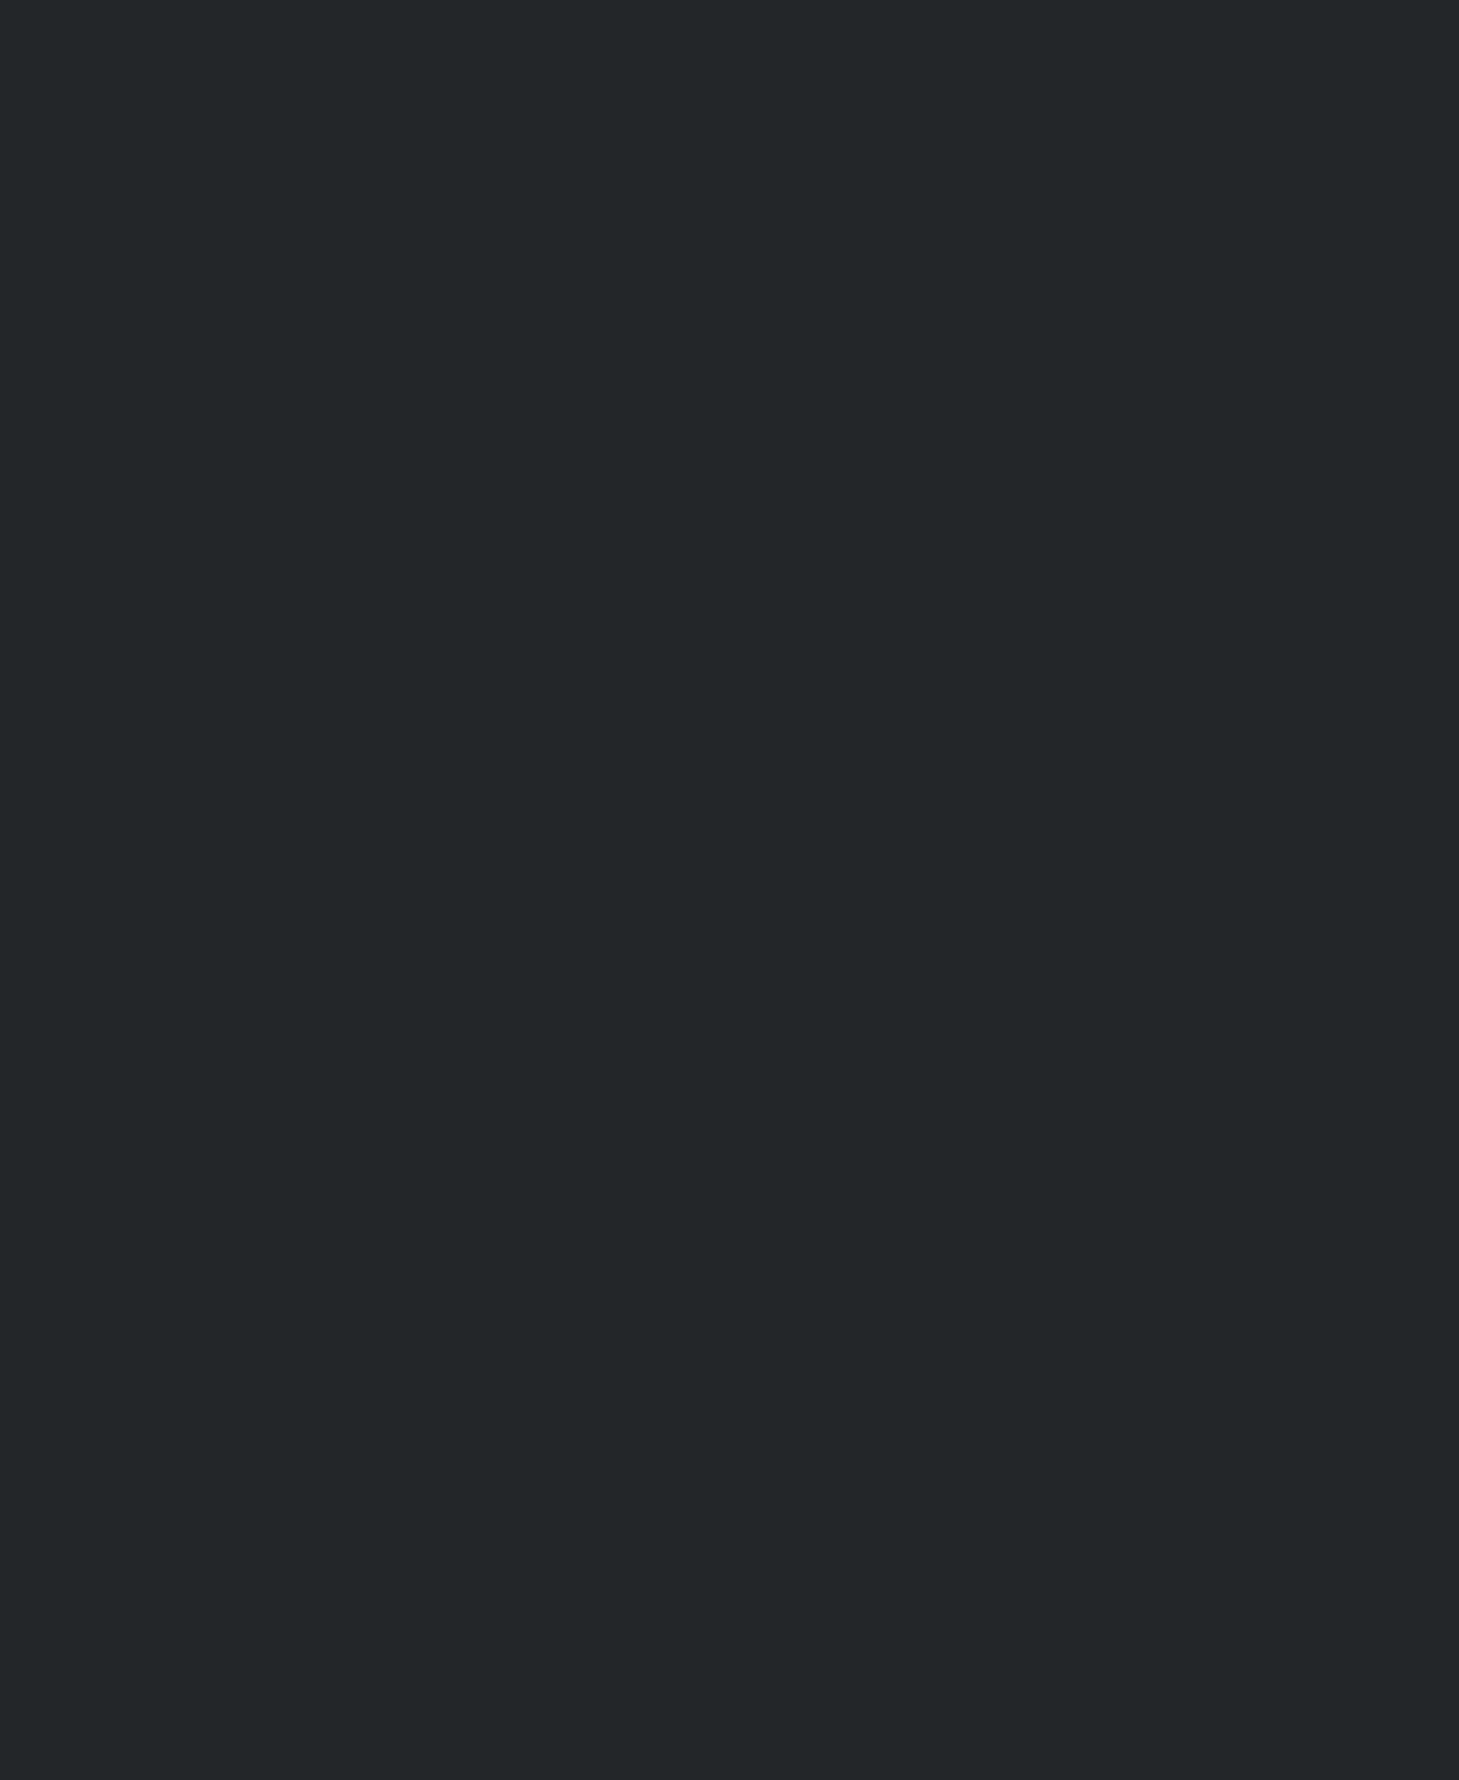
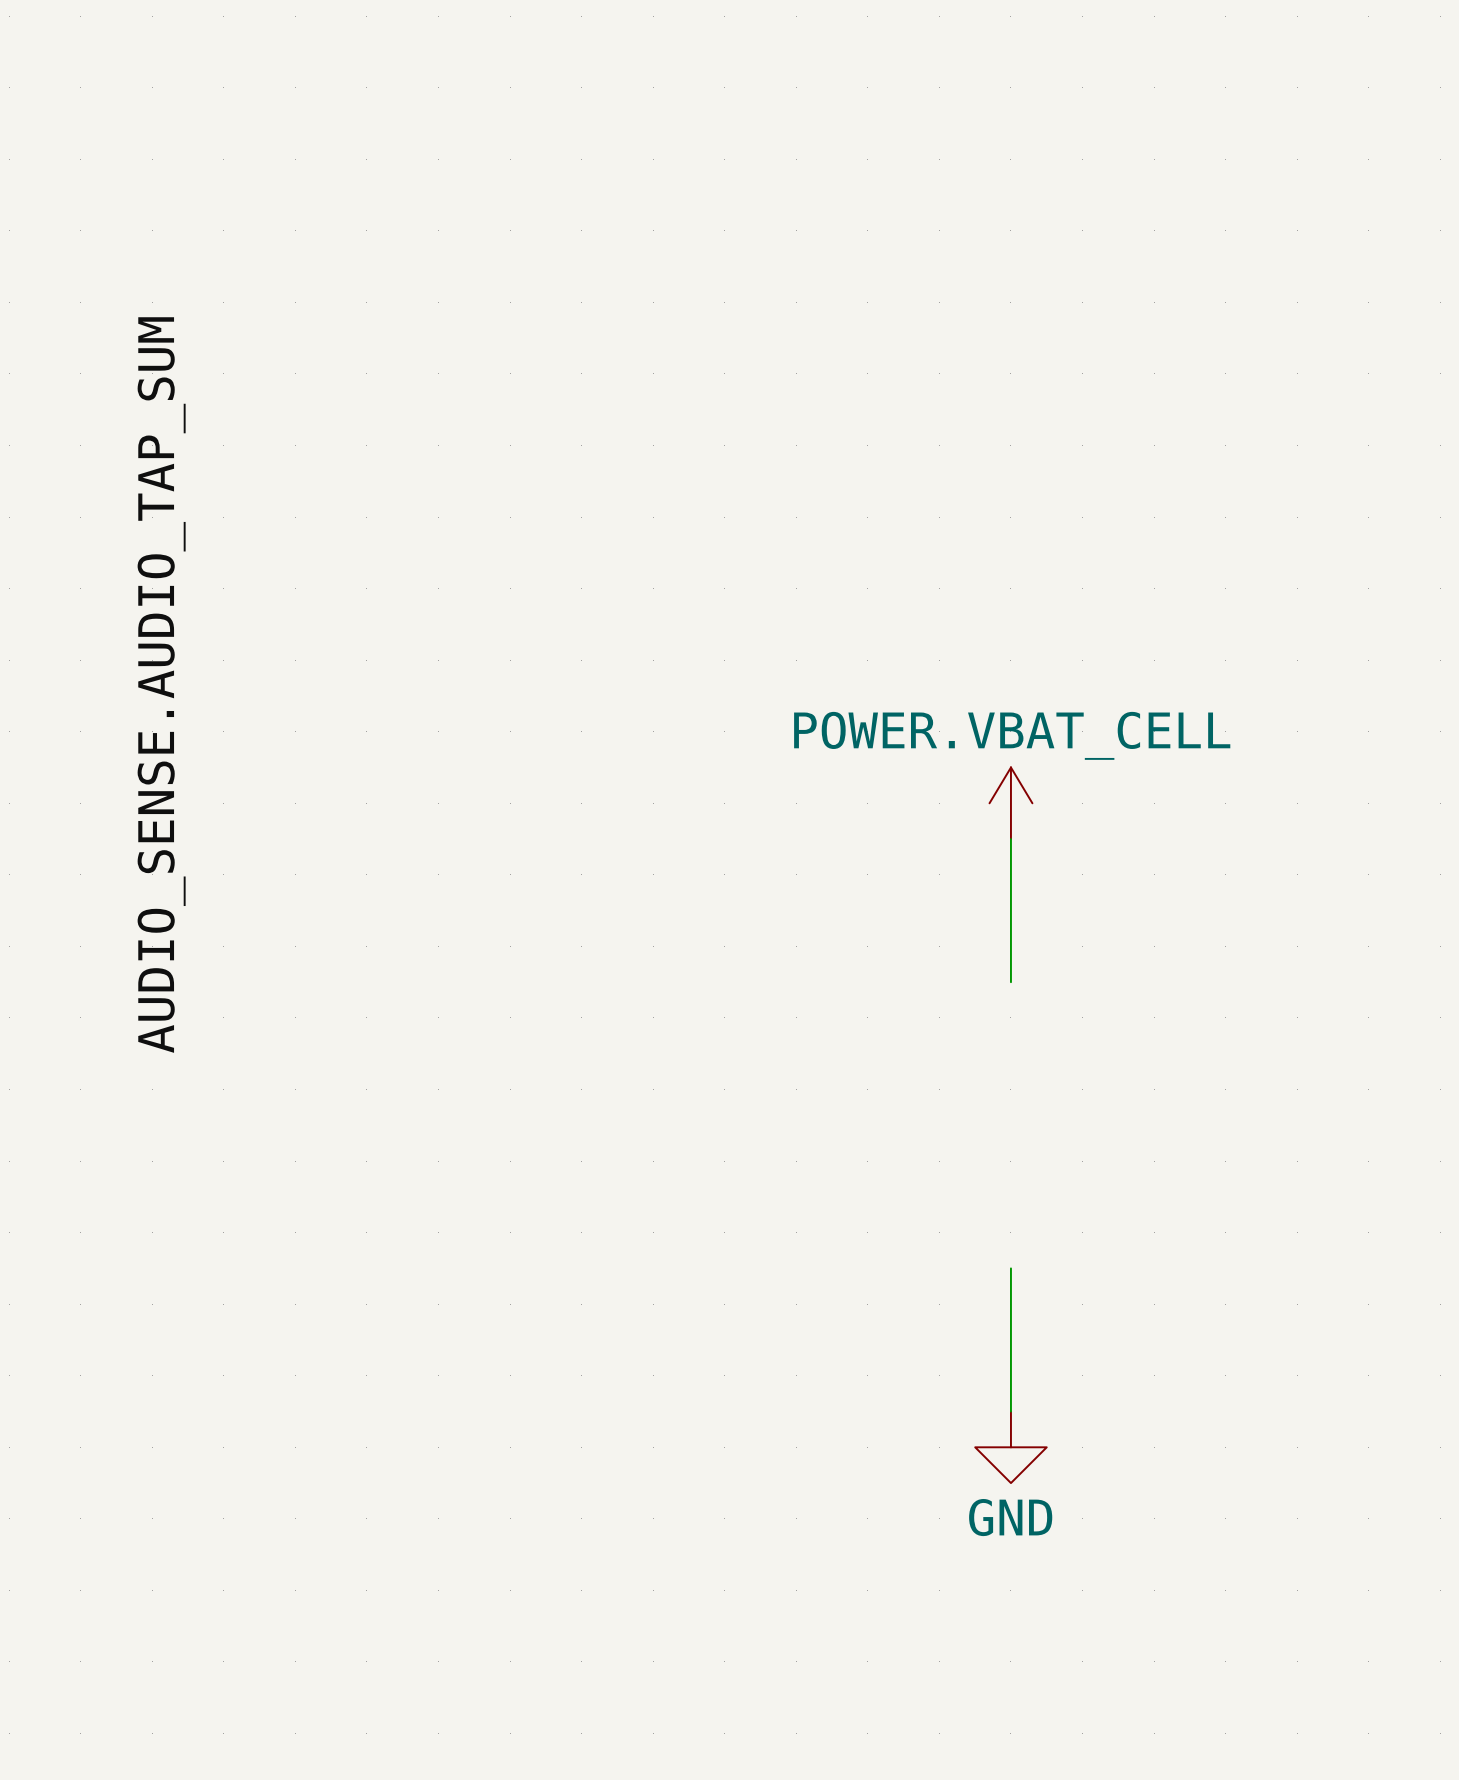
label: none -> AUDIO_SENSE.AUDIO_TAP_SUM (161, 685)
power symbol: none -> POWER.VBAT_CELL (1010, 803)
wire: none -> (1010, 839) (1010, 982)
wire: none -> (1010, 1268) (1010, 1411)
power symbol: none -> GND (1010, 1447)

